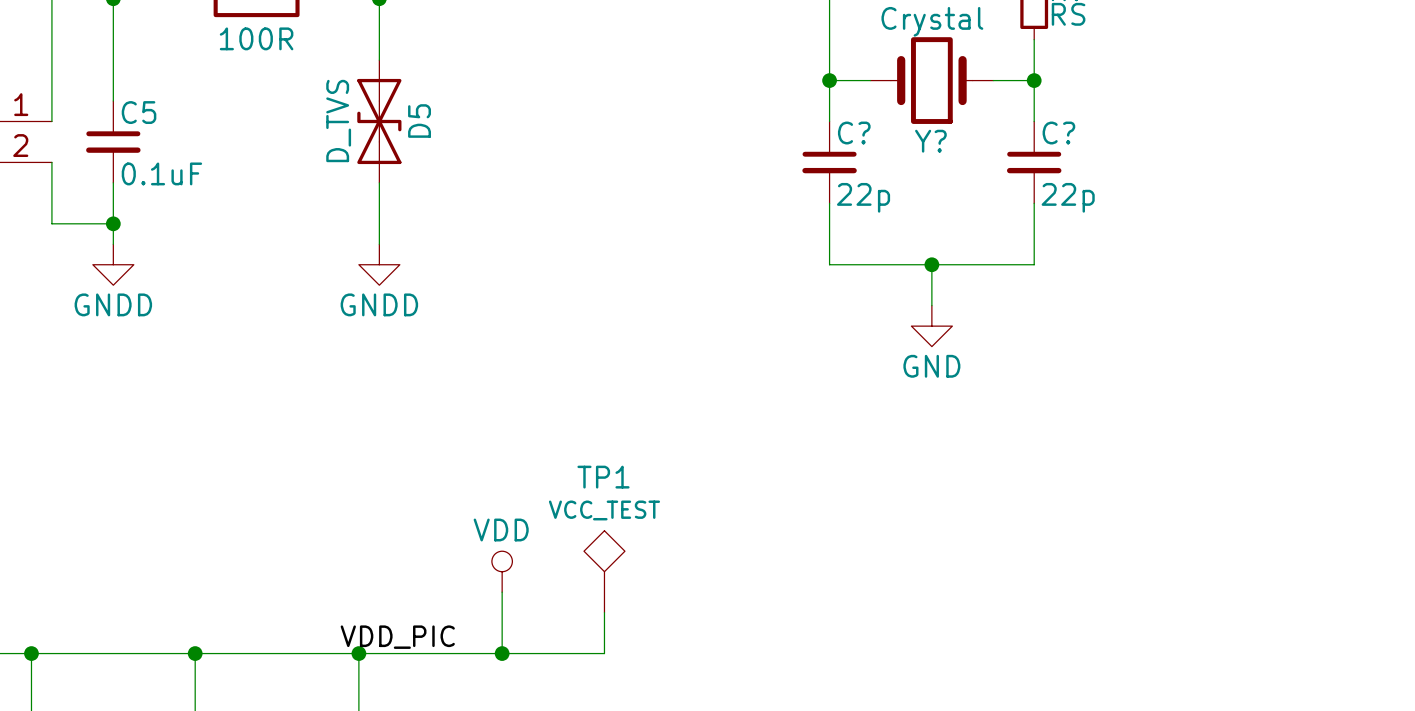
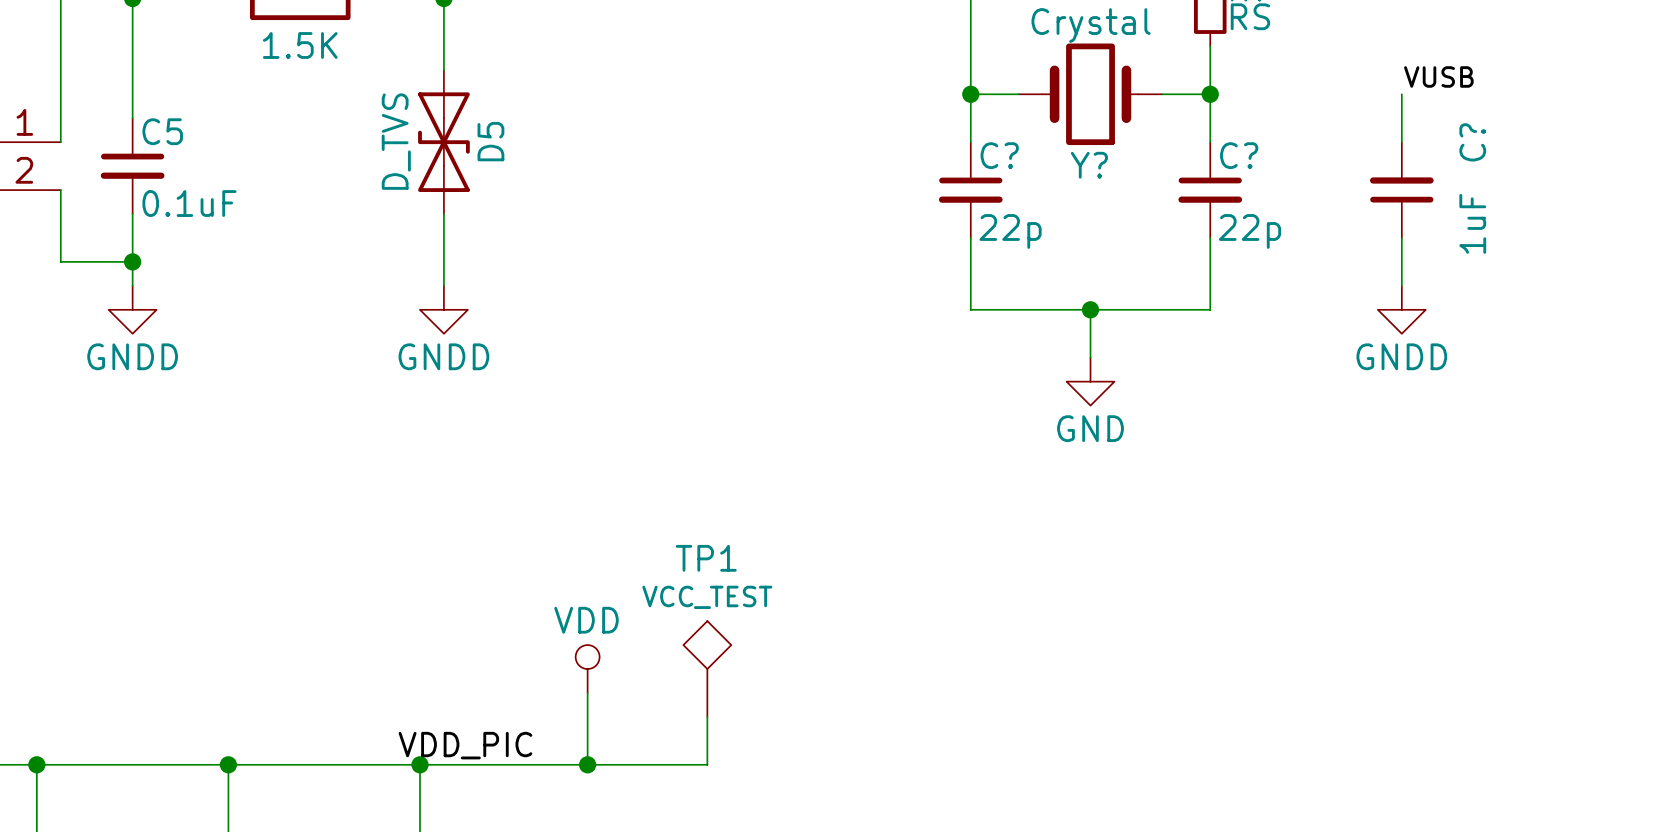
part value: 100R (256, 38) -> 1.5K (300, 45)
label: none -> VUSB (1438, 76)
wire: none -> (1401, 94) (1401, 142)
C?: none -> 1uF (1401, 190)
wire: none -> (1401, 237) (1401, 285)
power symbol: none -> GNDD (1401, 309)

